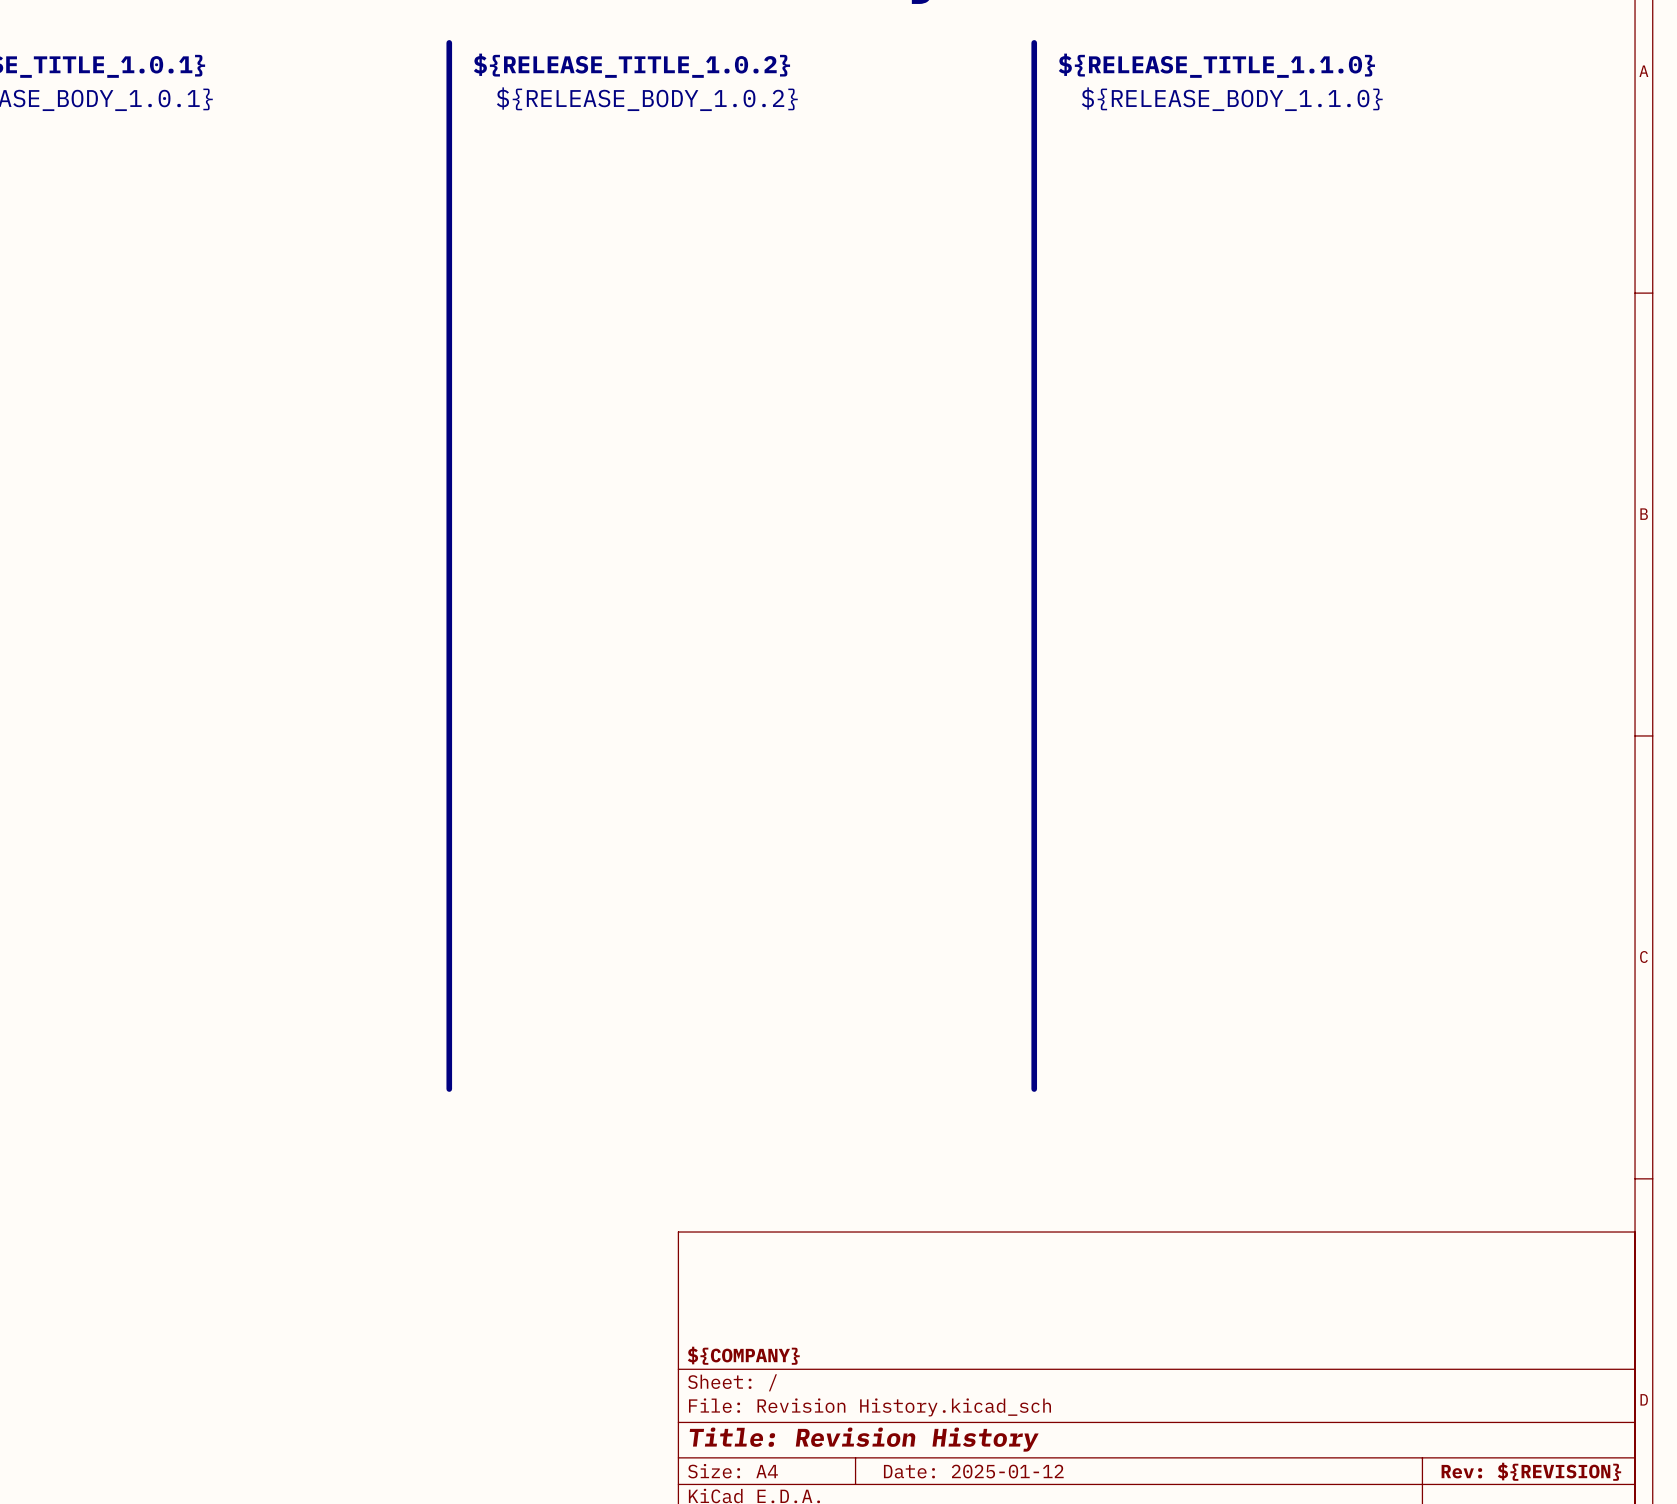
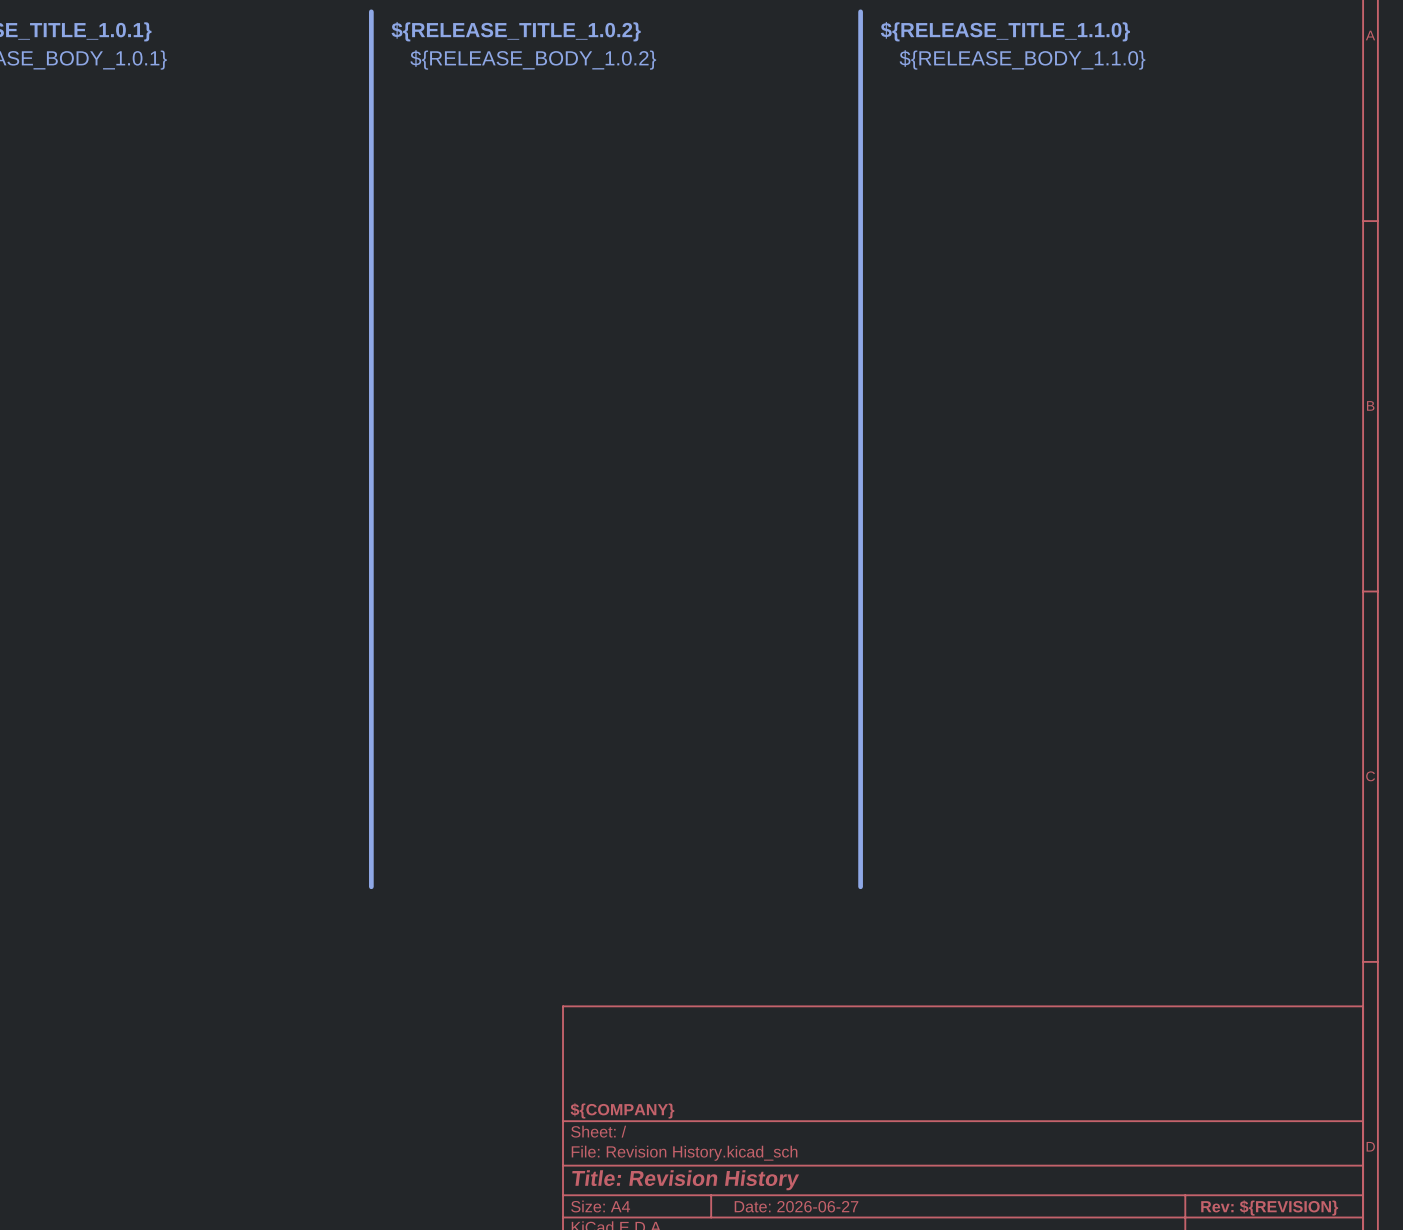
title block: Date: 2025-01-12 (973, 1471) -> Date: 2026-06-27 (796, 1206)

